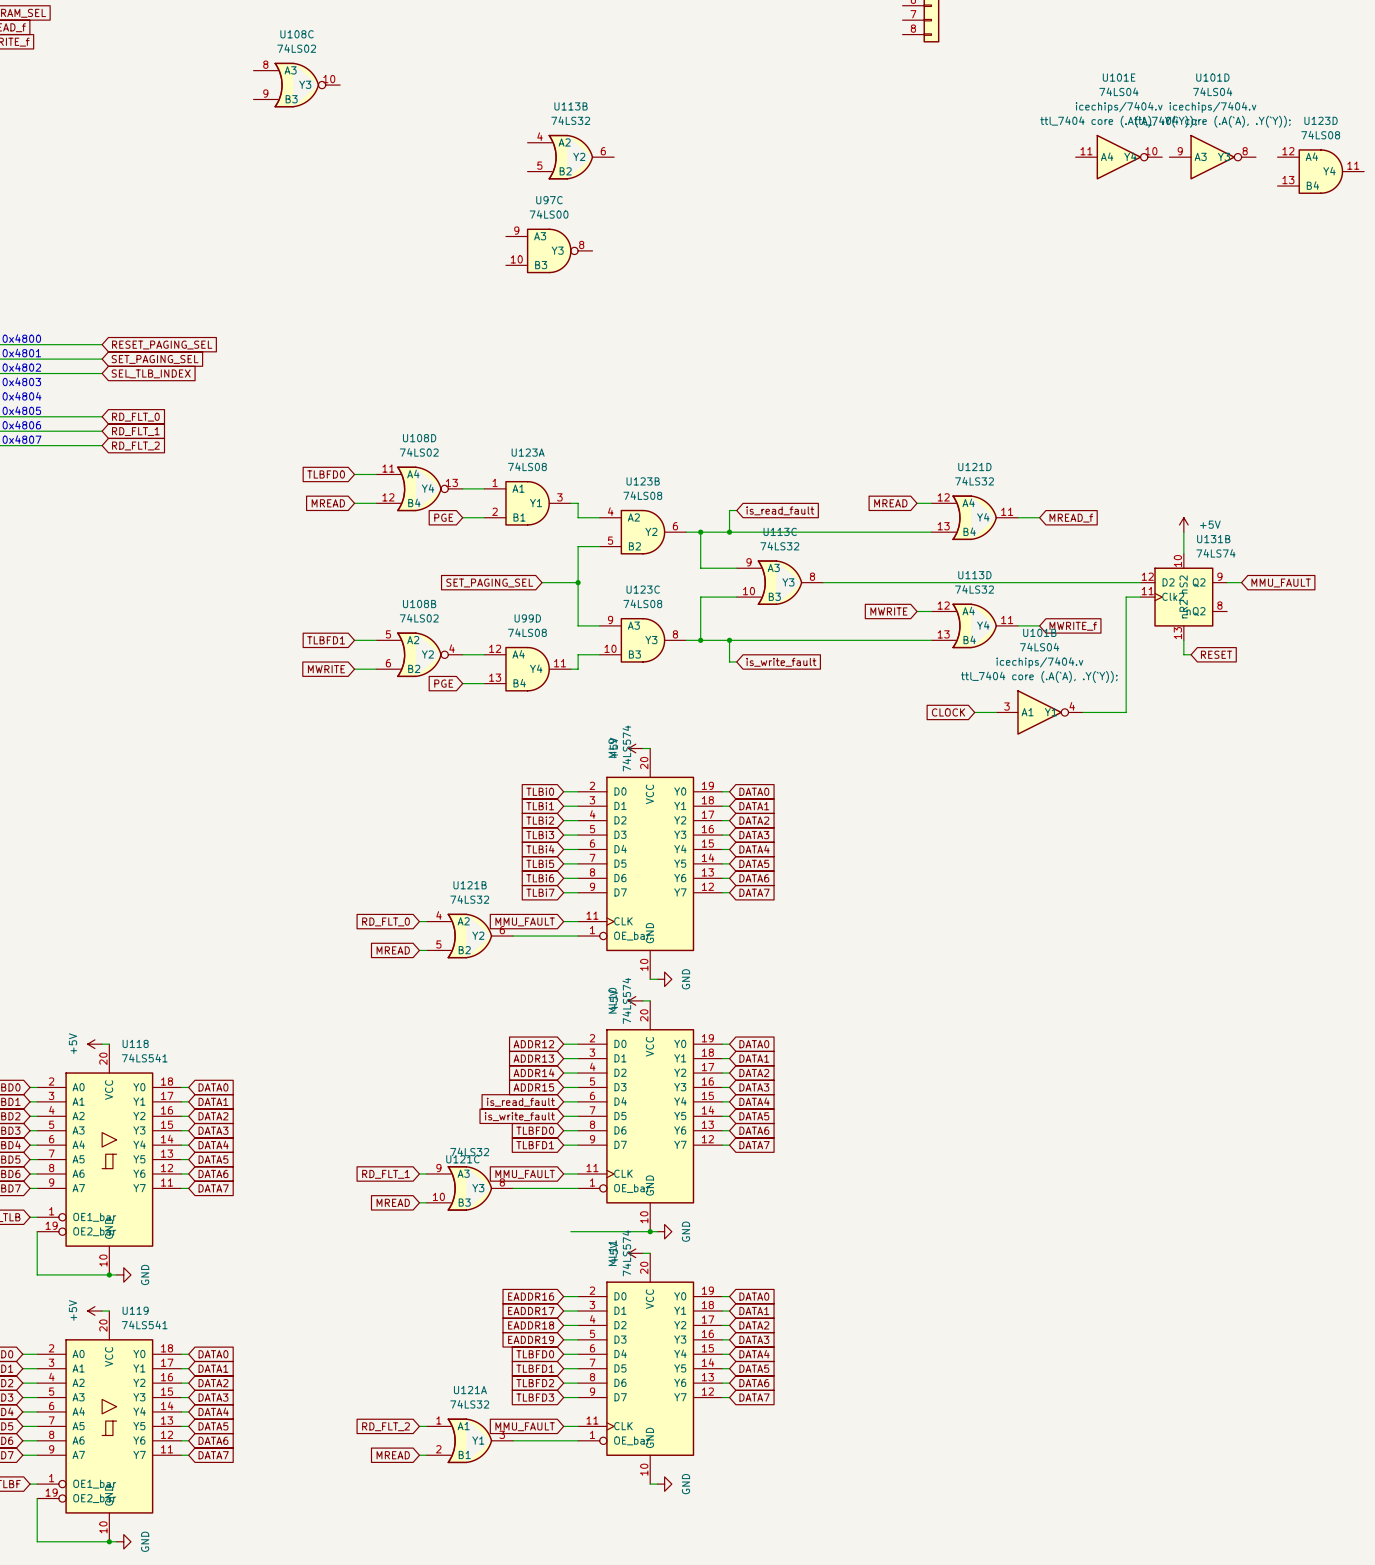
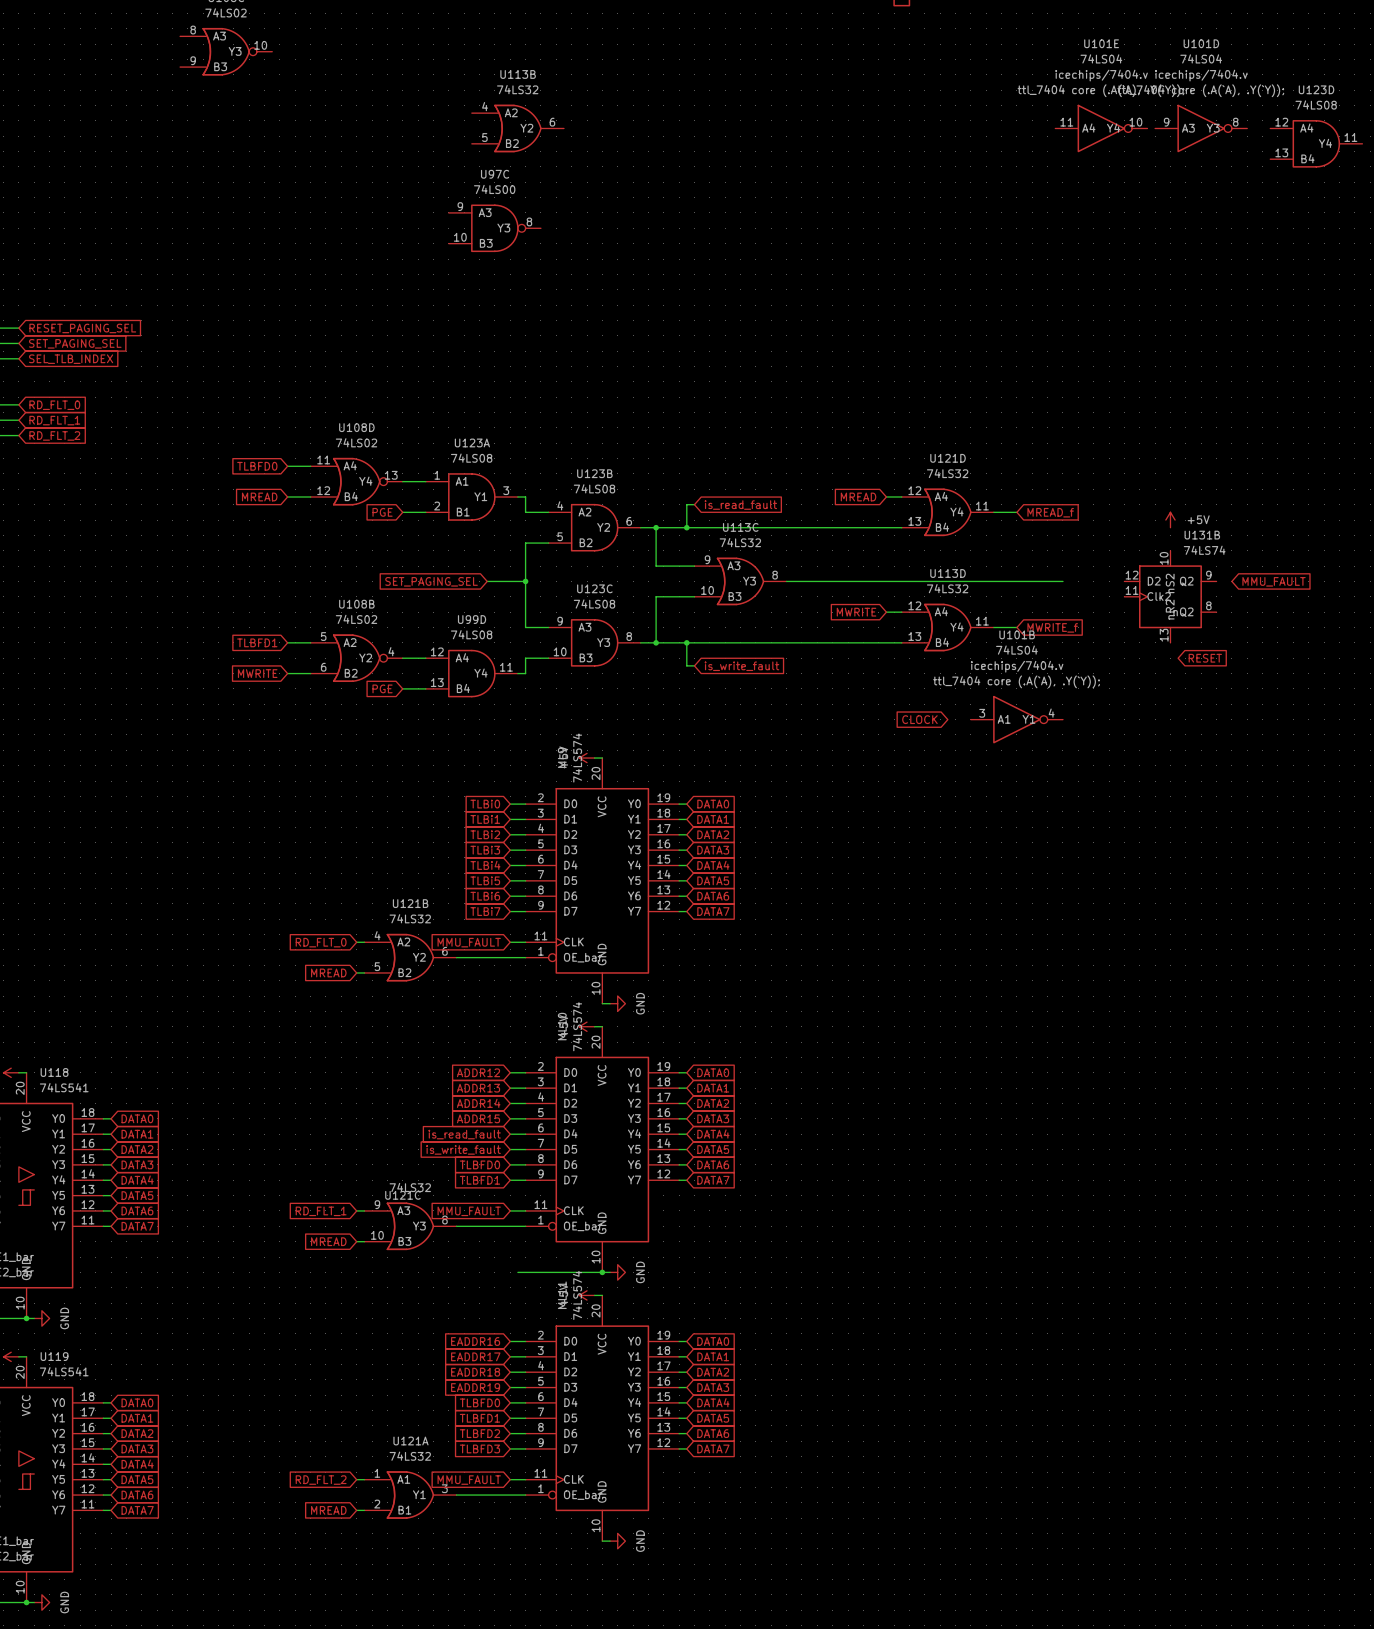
wire: (1183, 532) (1183, 553) -> none
wire: (1082, 582) (1140, 582) -> none
wire: (1227, 582) (1241, 582) -> none
wire: (1140, 597) (1126, 597) (1126, 712) (1082, 712) -> none
wire: (1183, 640) (1183, 654) (1191, 654) -> none
wire: (974, 712) (996, 712) -> none

